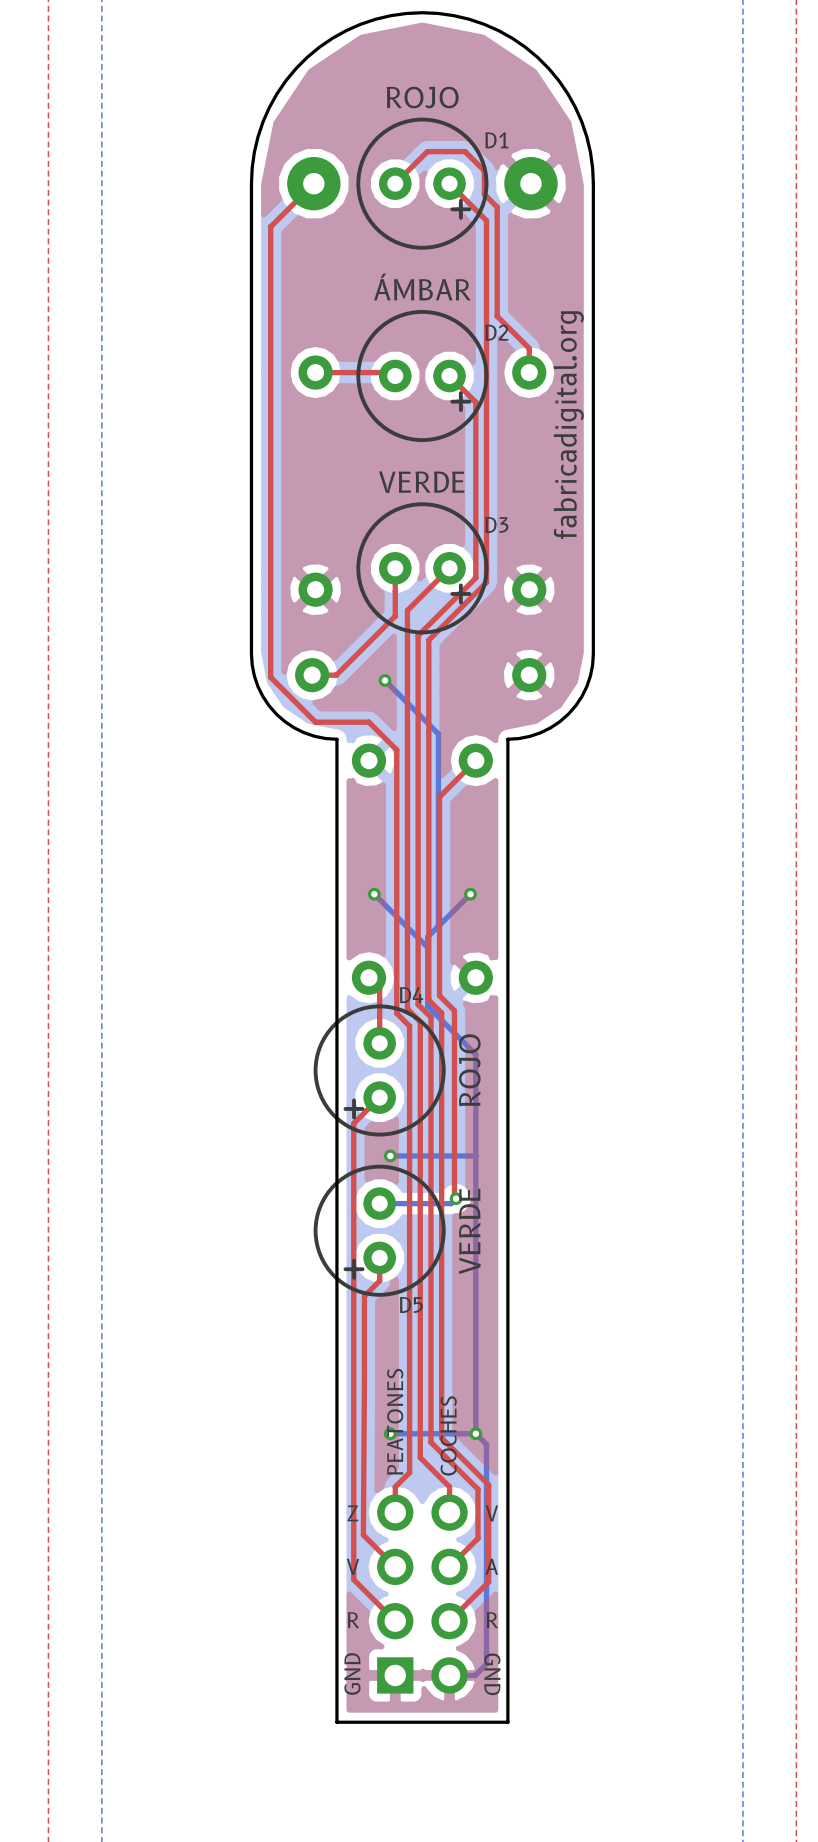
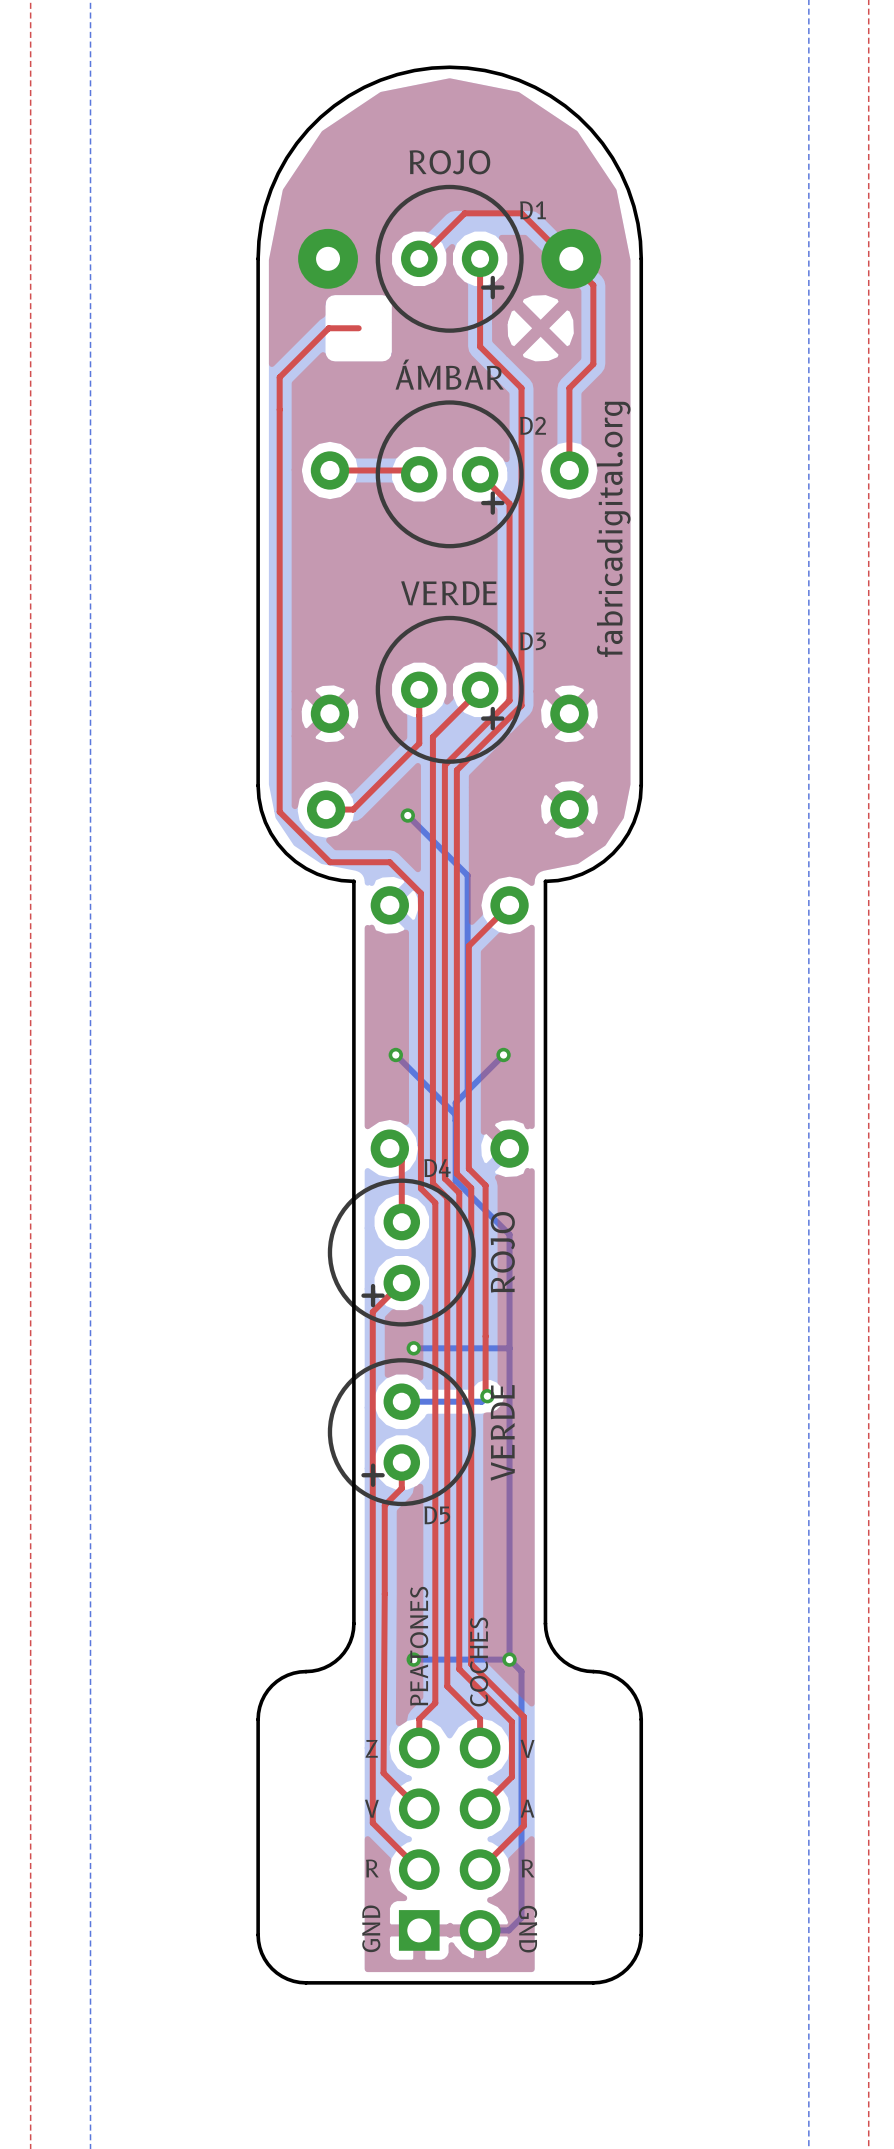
top track: (427, 151) (465, 151) (484, 170) (484, 194) (497, 207) (497, 316) (529, 348) -> (455, 222) (464, 213) (521, 213) (593, 285) (593, 364) (569, 388) (569, 443)
top track: (313, 183) (270, 226) (270, 289) -> (358, 328) (328, 328) (279, 377)
top track: (449, 183) (486, 220) (486, 299) -> (480, 258) (480, 346) (521, 388)
board edge: (336, 1401) (336, 1722) -> (353, 1623) (350, 1642) (339, 1657) (324, 1667) (293, 1673) (276, 1681) (268, 1690) (261, 1701) (258, 1719) (258, 1934) (261, 1953) (272, 1968) (282, 1976) (293, 1981) (353, 1982)
board edge: (507, 1401) (507, 1722) -> (545, 1623) (549, 1642) (559, 1657) (575, 1667) (605, 1673) (622, 1681) (631, 1690) (637, 1701) (641, 1719) (641, 1934) (637, 1953) (627, 1968) (617, 1976) (605, 1981) (545, 1982)

